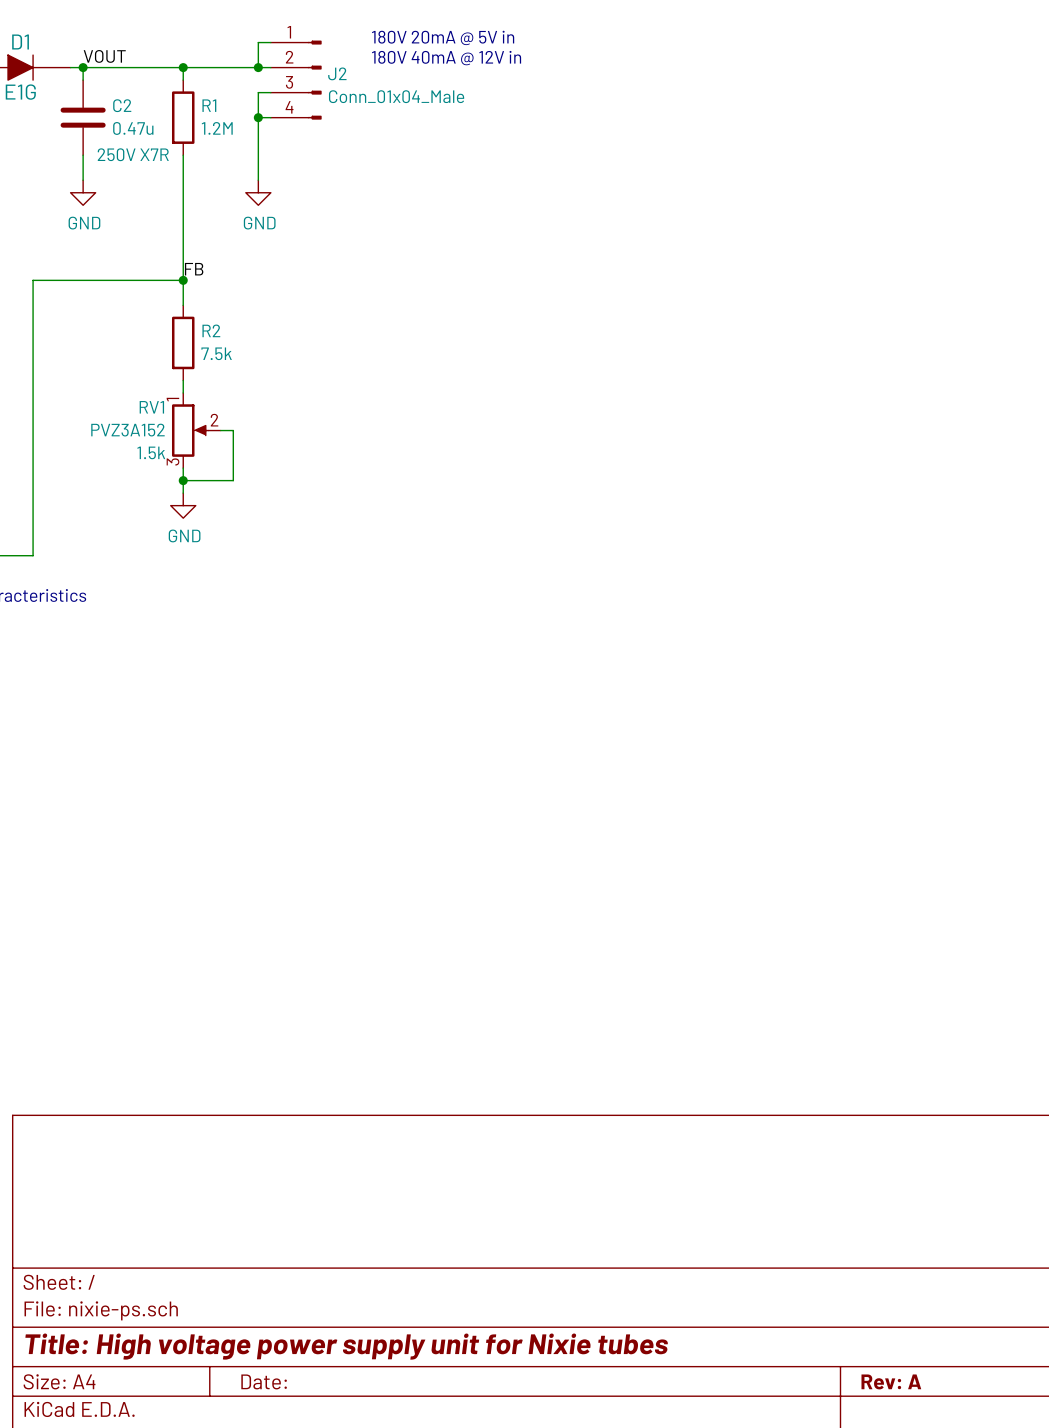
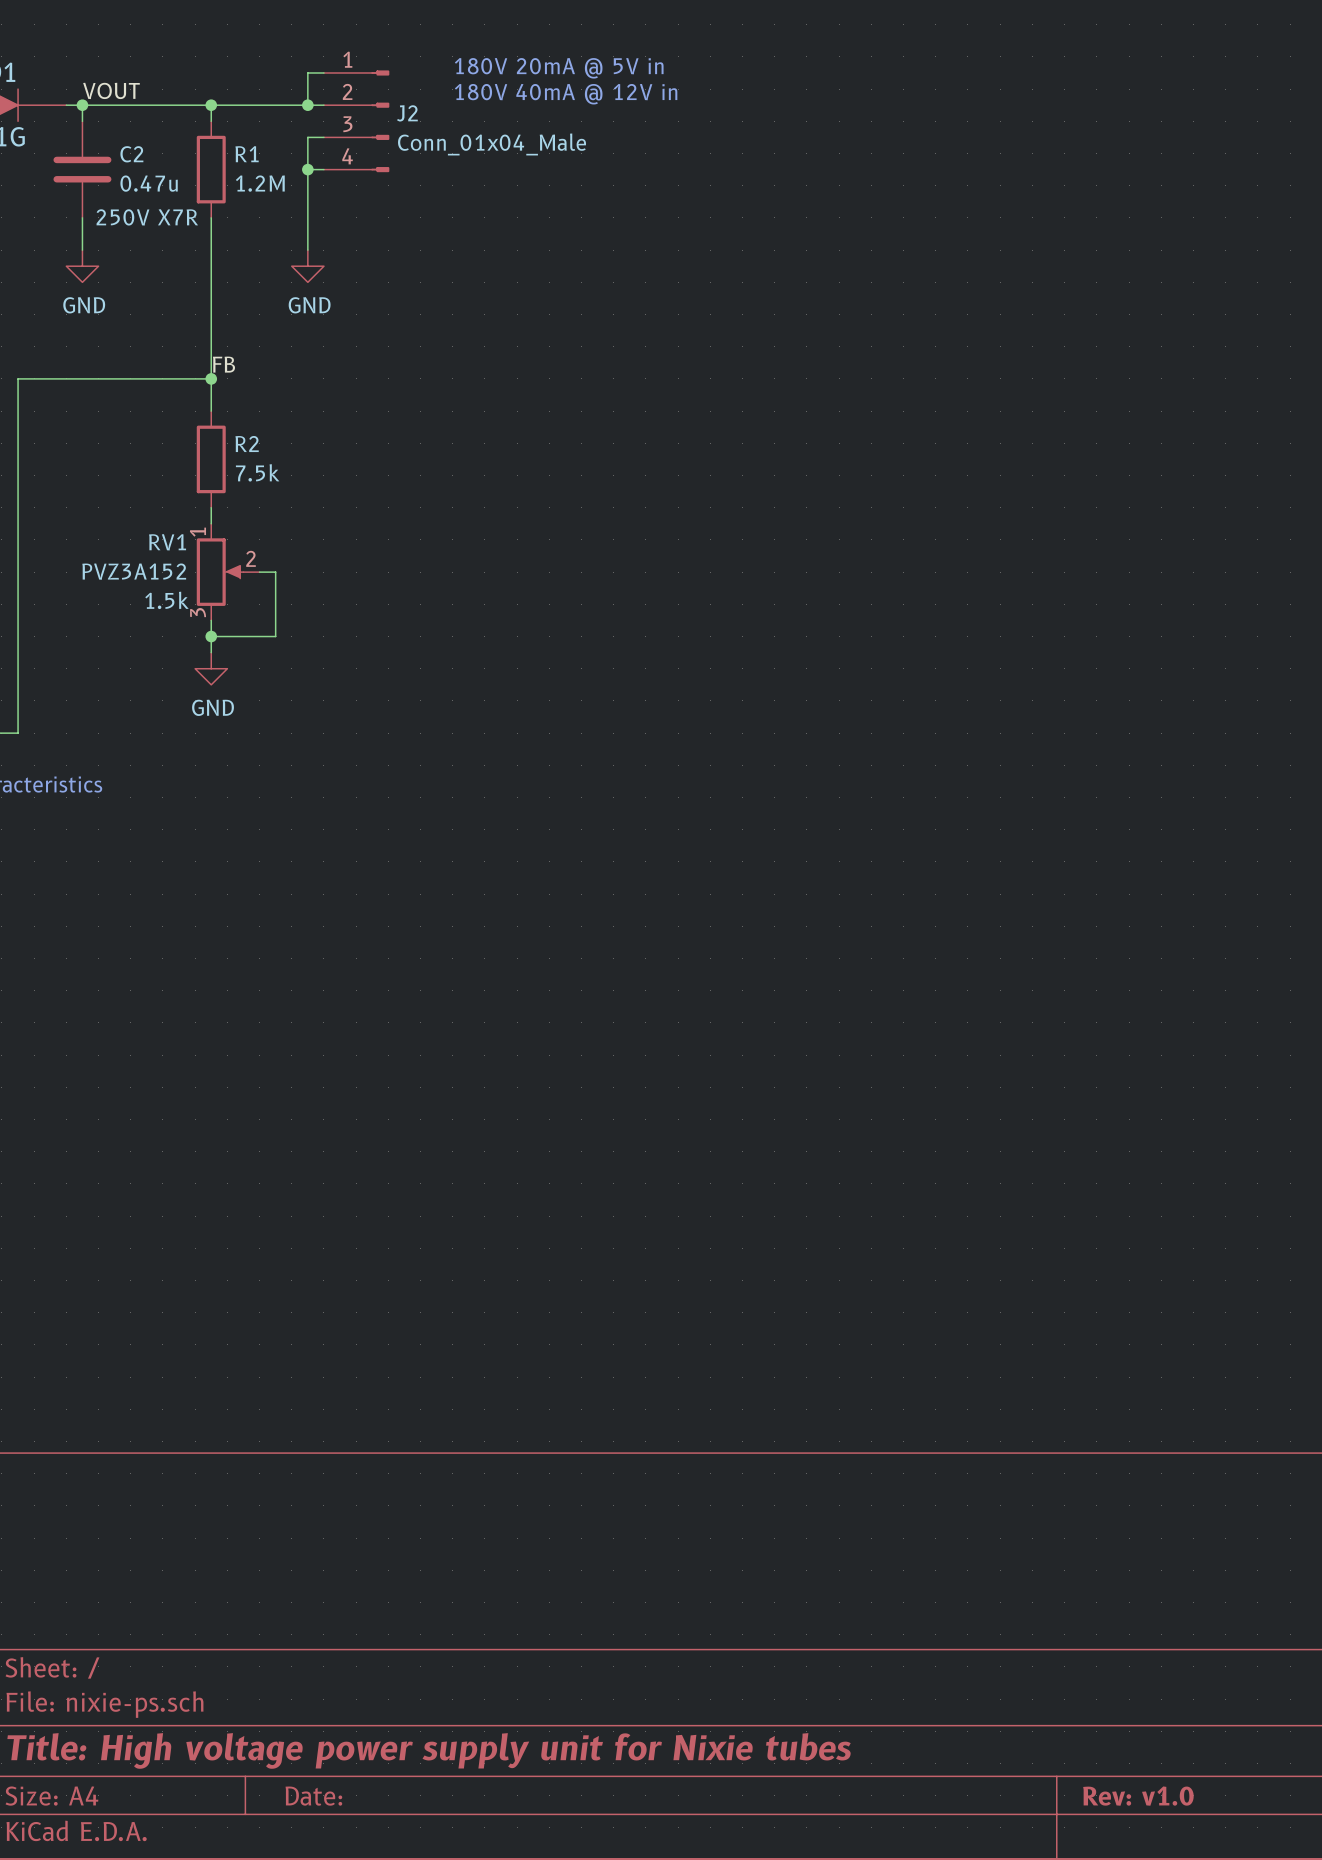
title block: Rev: A (891, 1381) -> Rev: v1.0 (1138, 1796)

